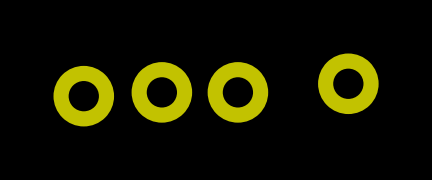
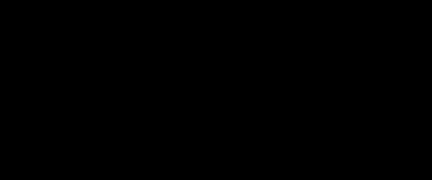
part: (348, 83) -> none
part: (161, 92) -> none
part: (237, 92) -> none
part: (83, 96) -> none

